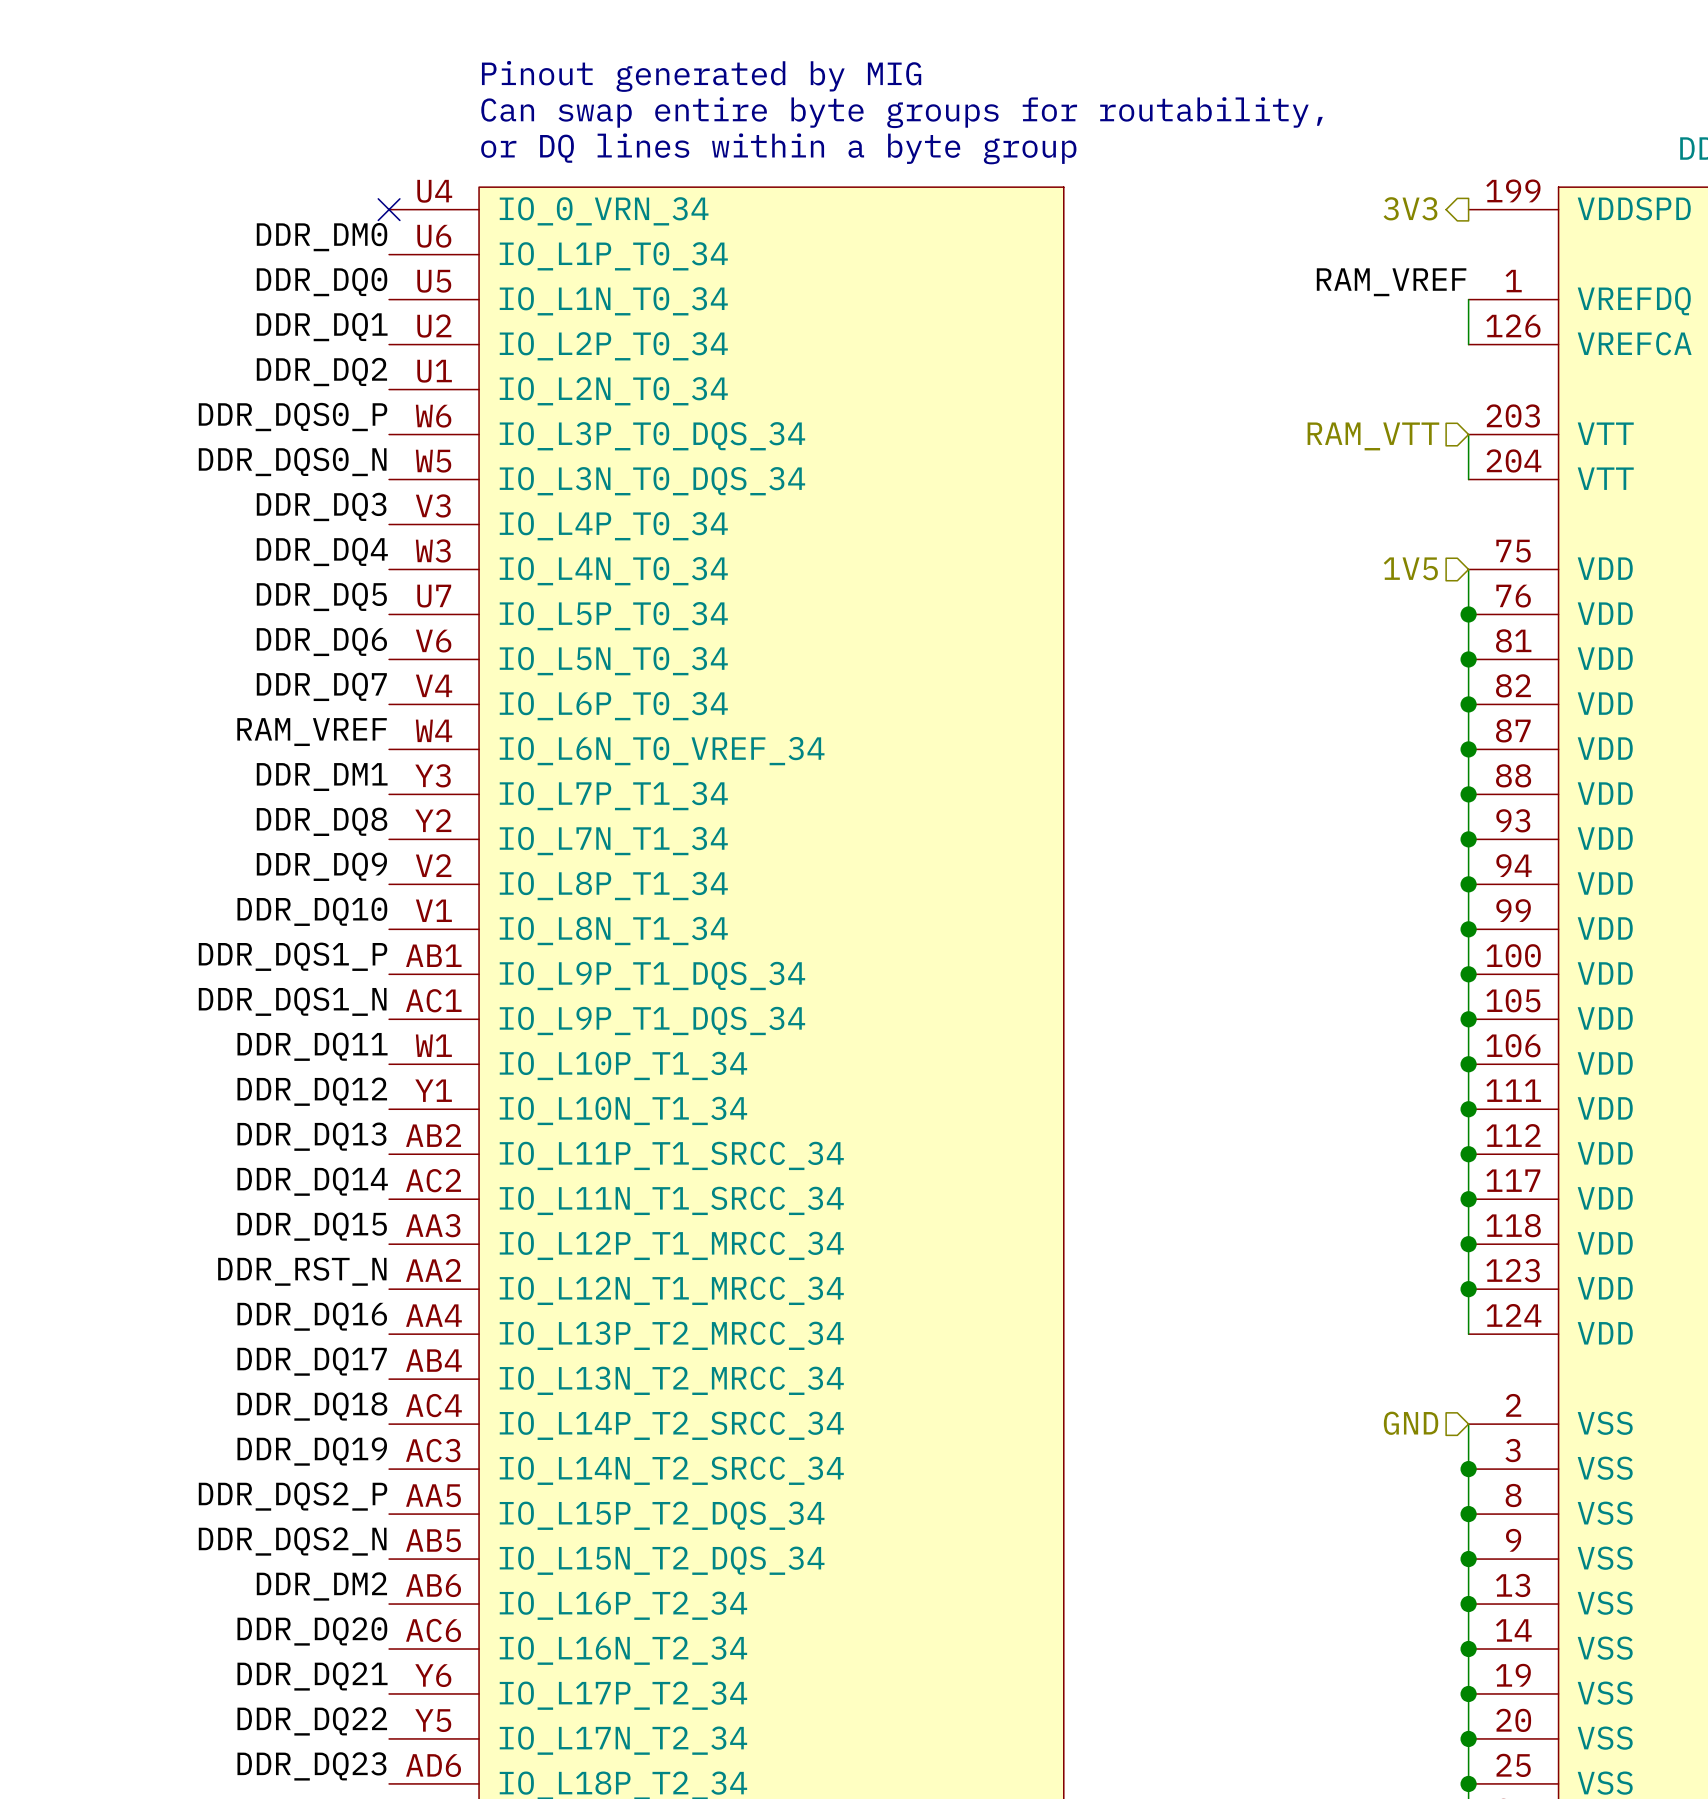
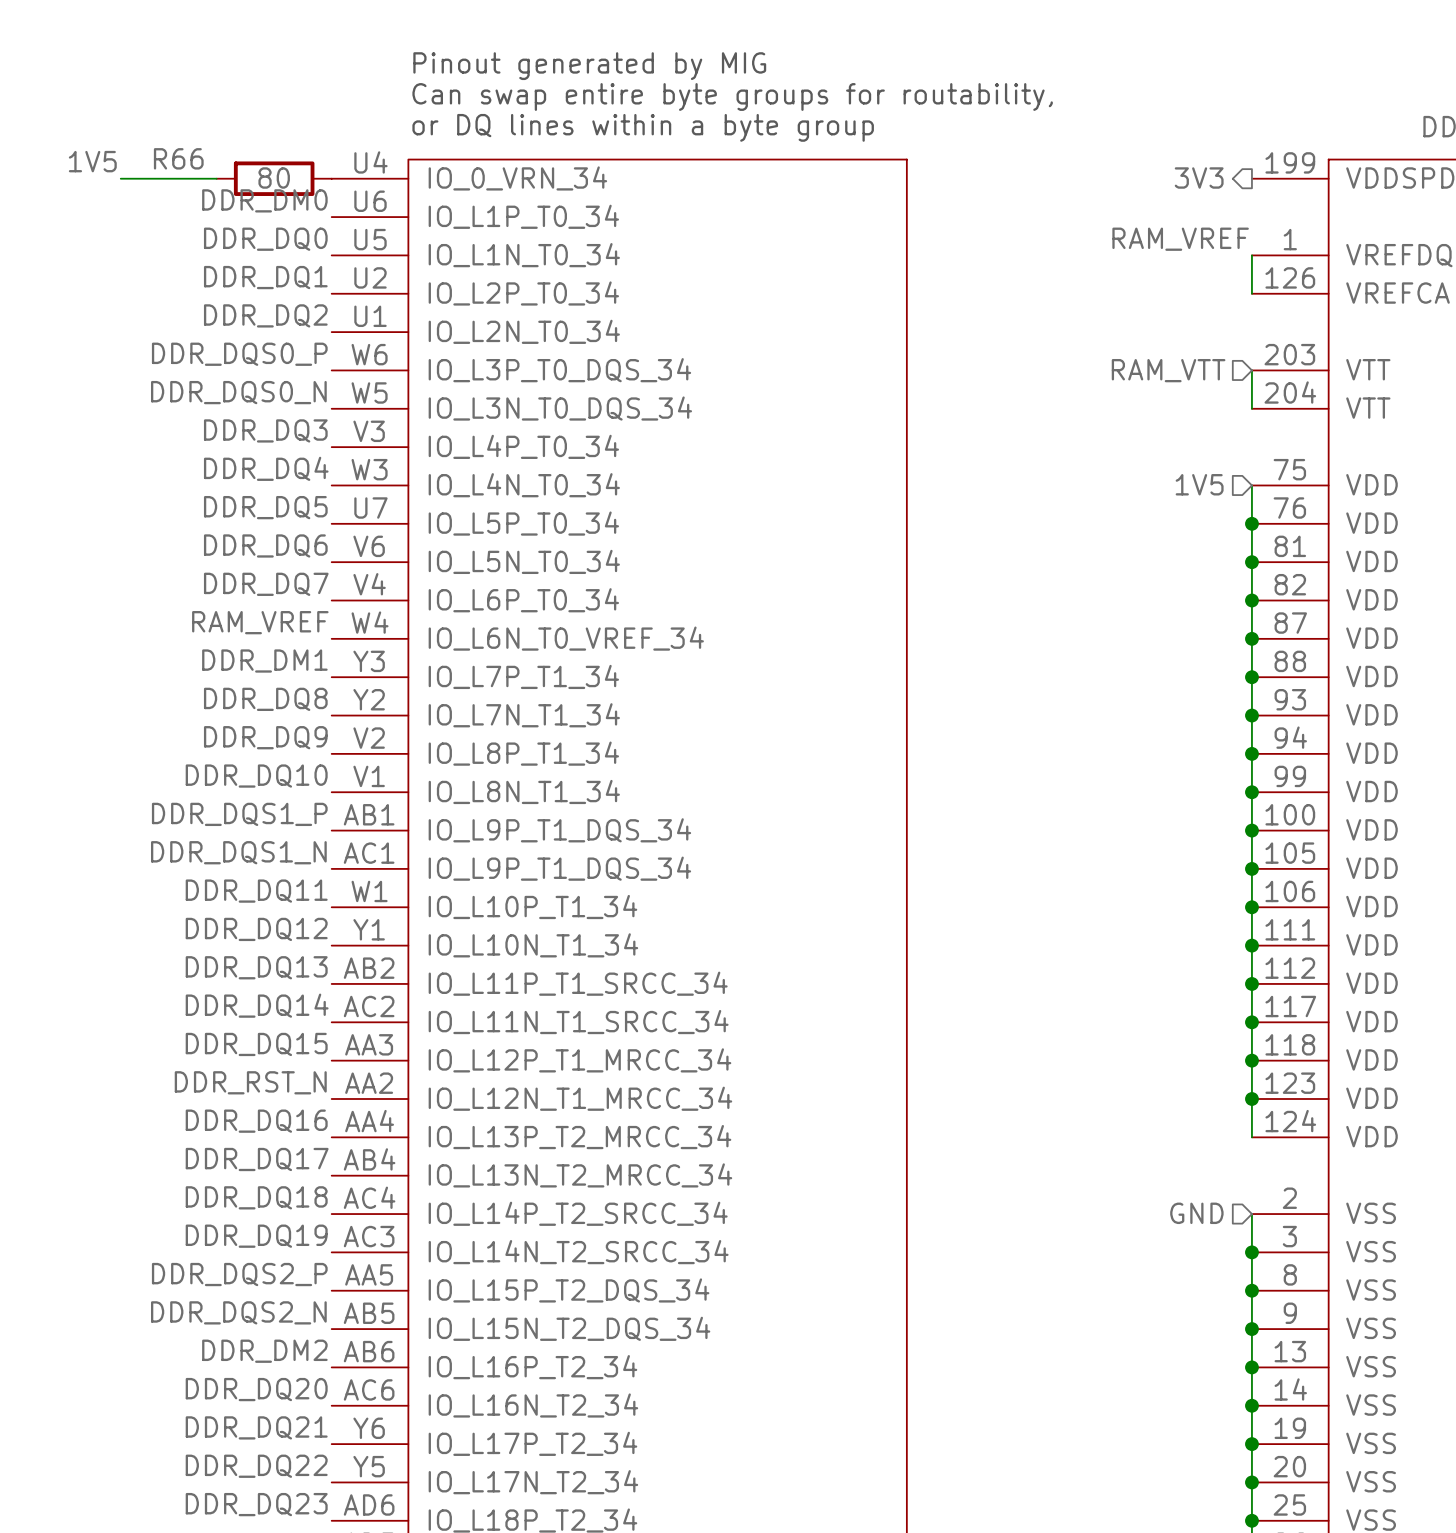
label: none -> 1V5 (92, 161)
wire: none -> (120, 178) (216, 178)
R66: none -> 80 (274, 178)
no-connect mark: (389, 209) -> none

